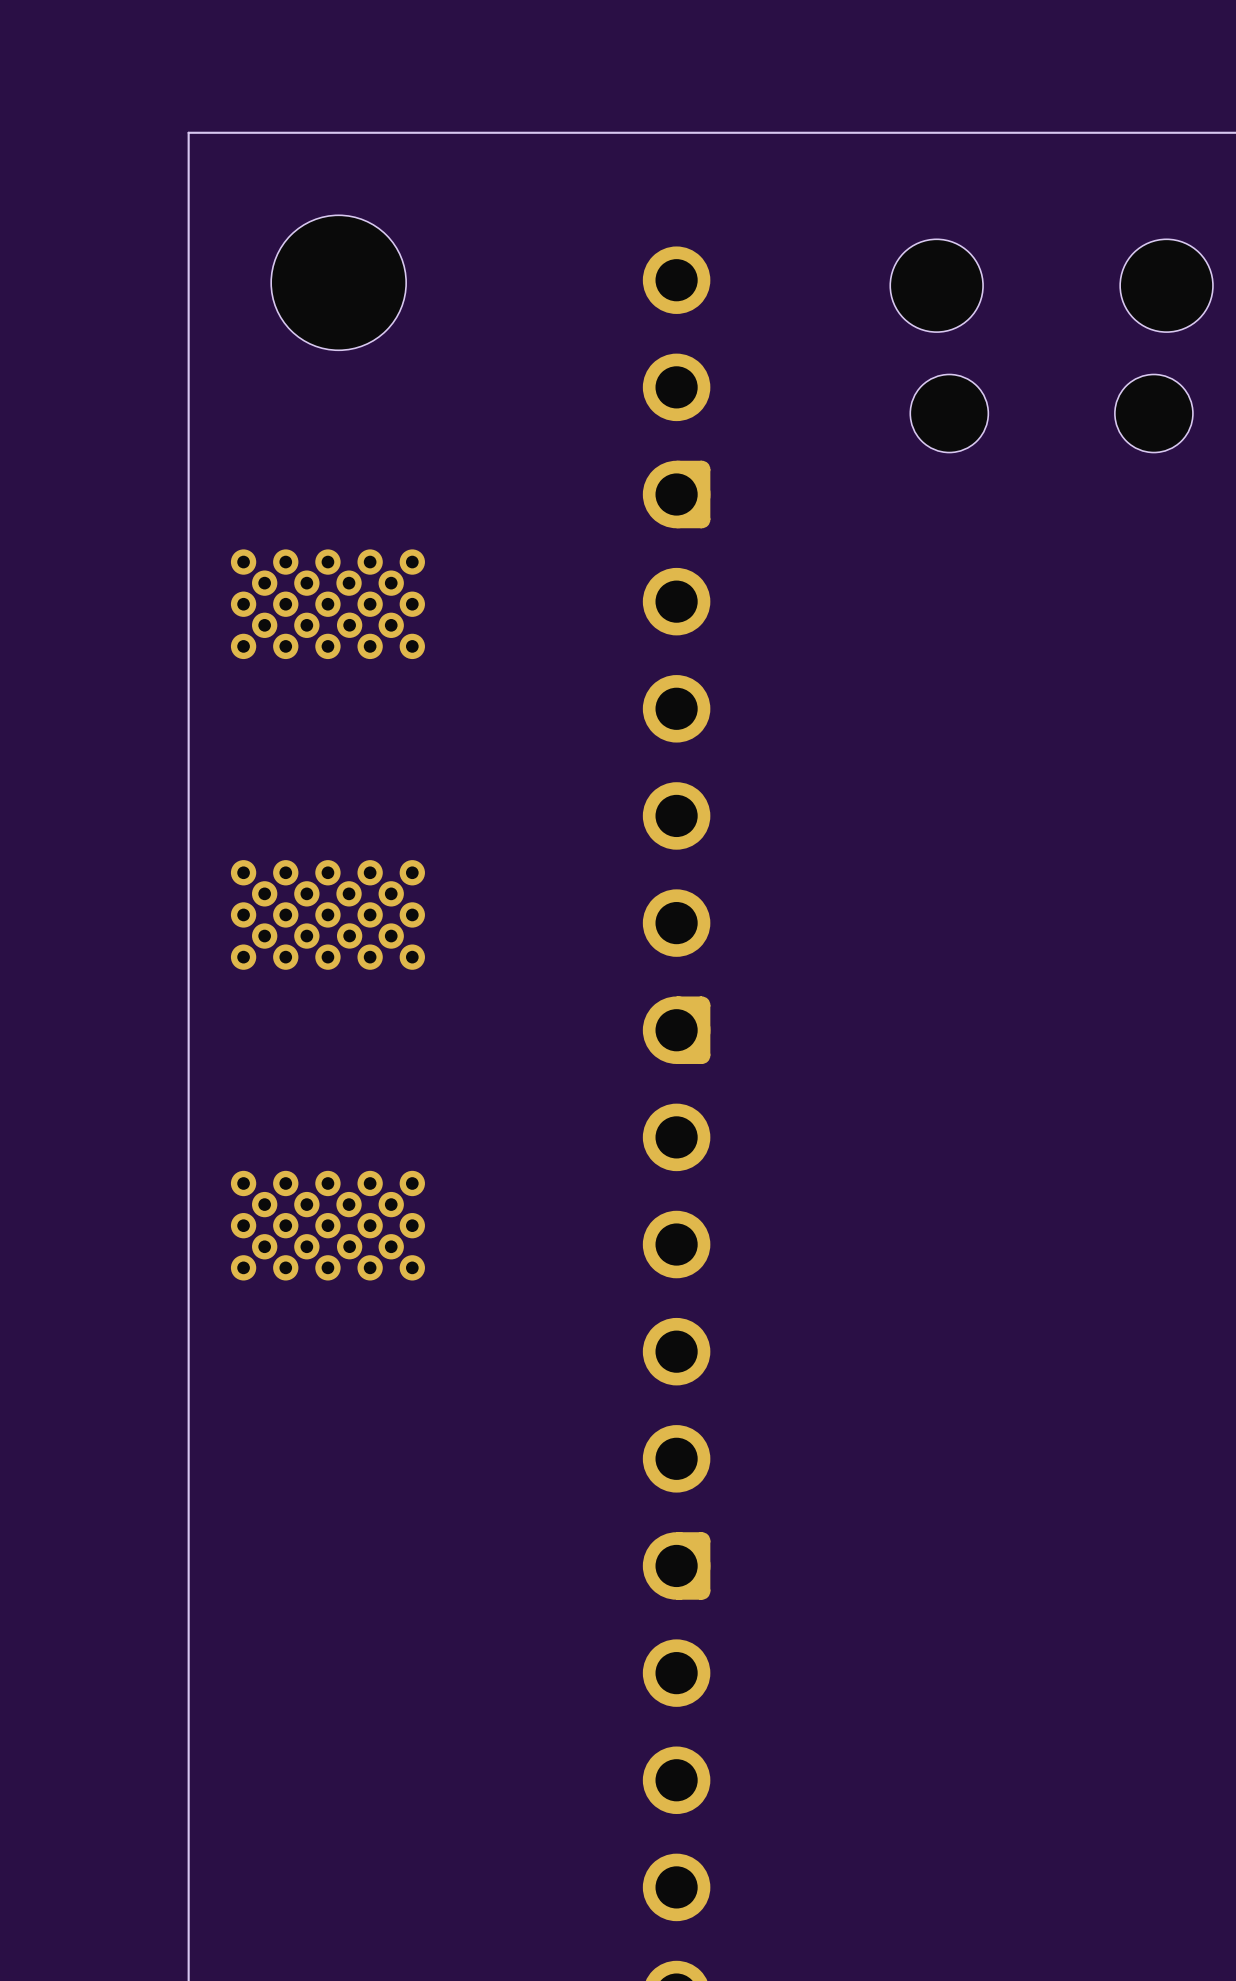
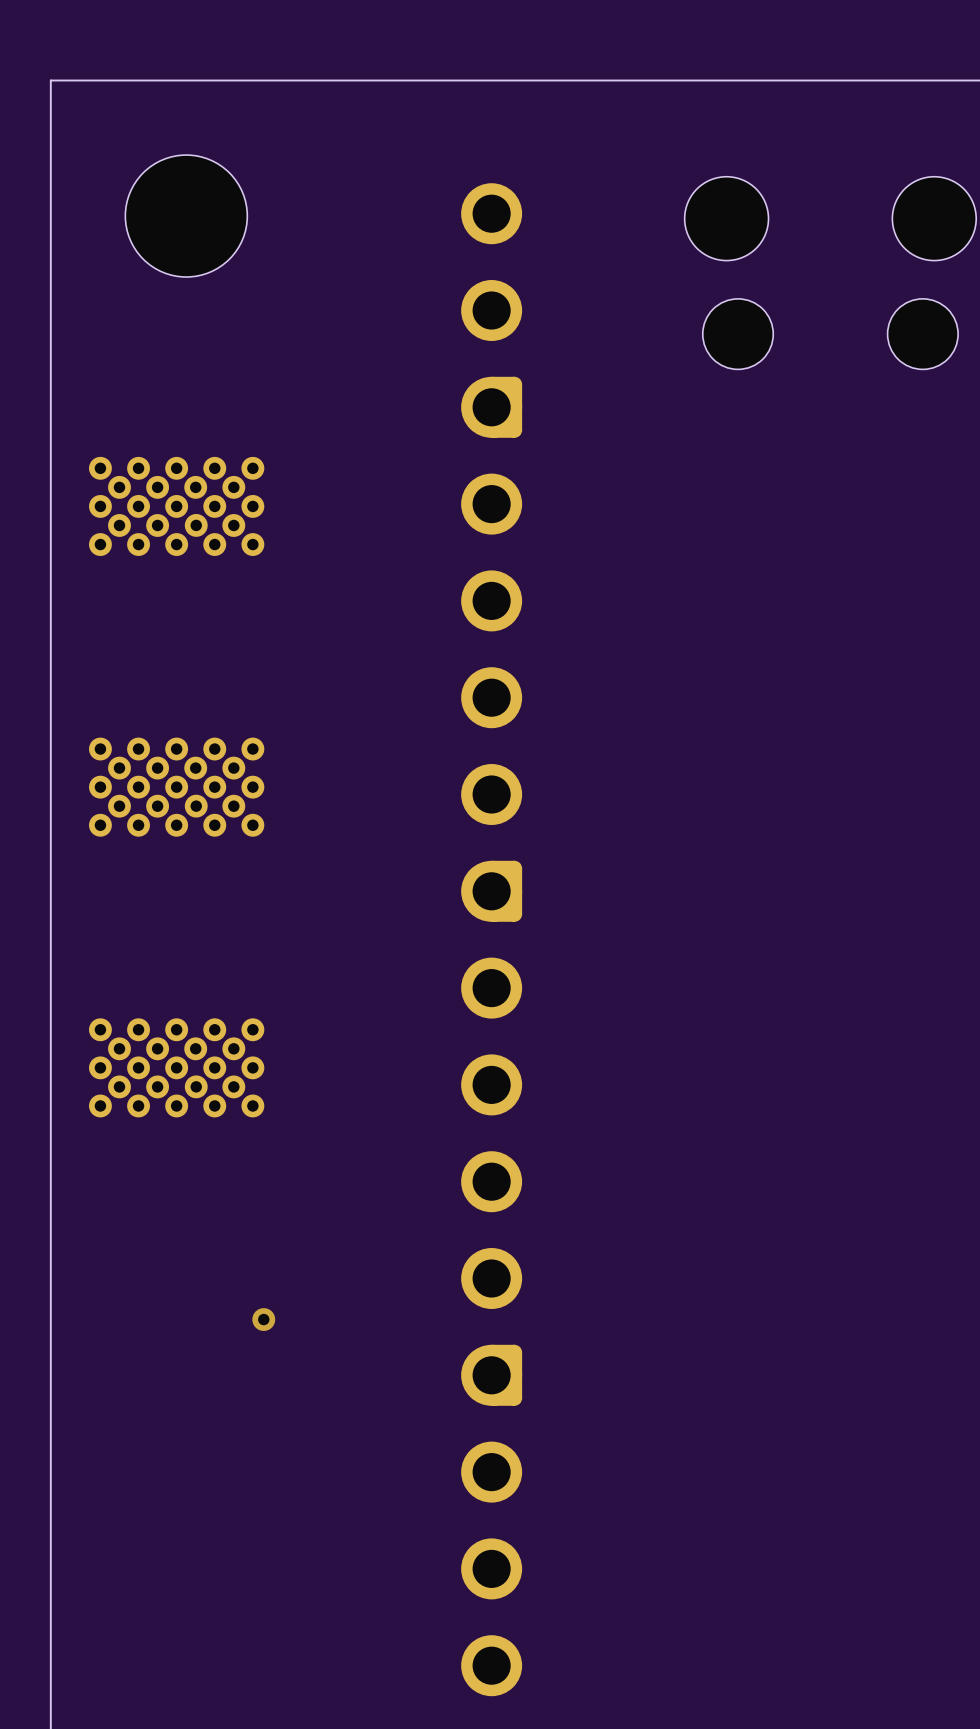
via: none -> (263, 1319)

